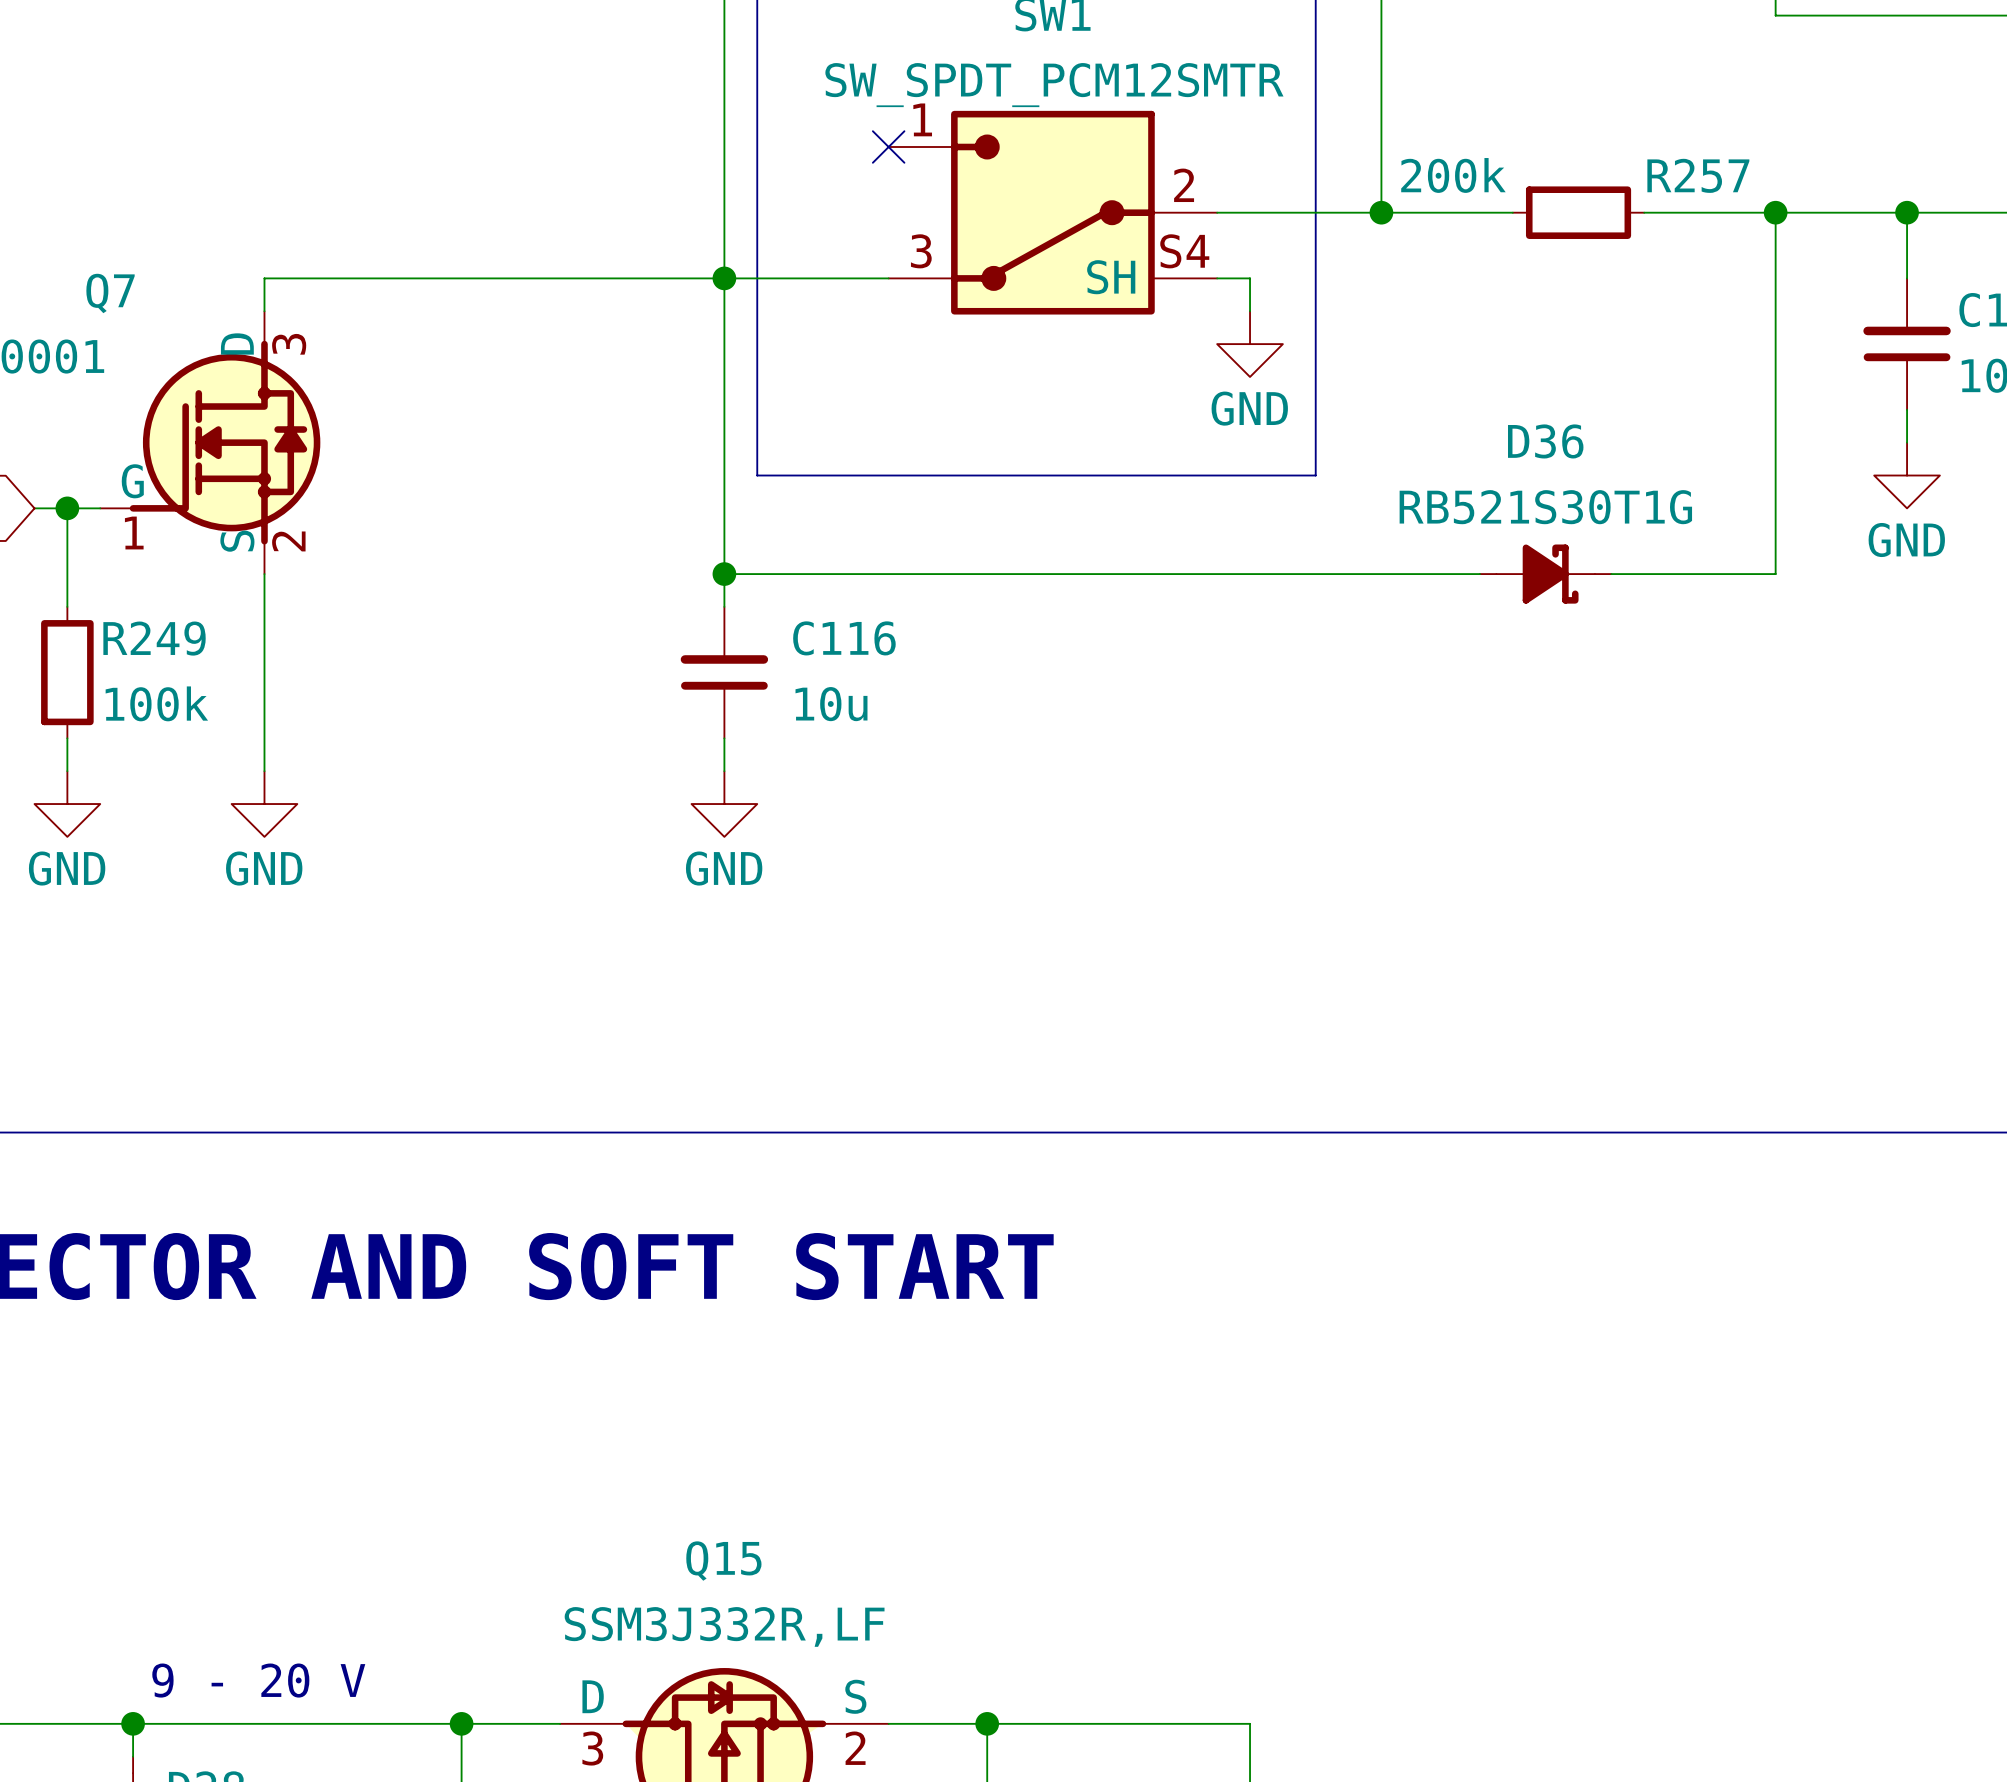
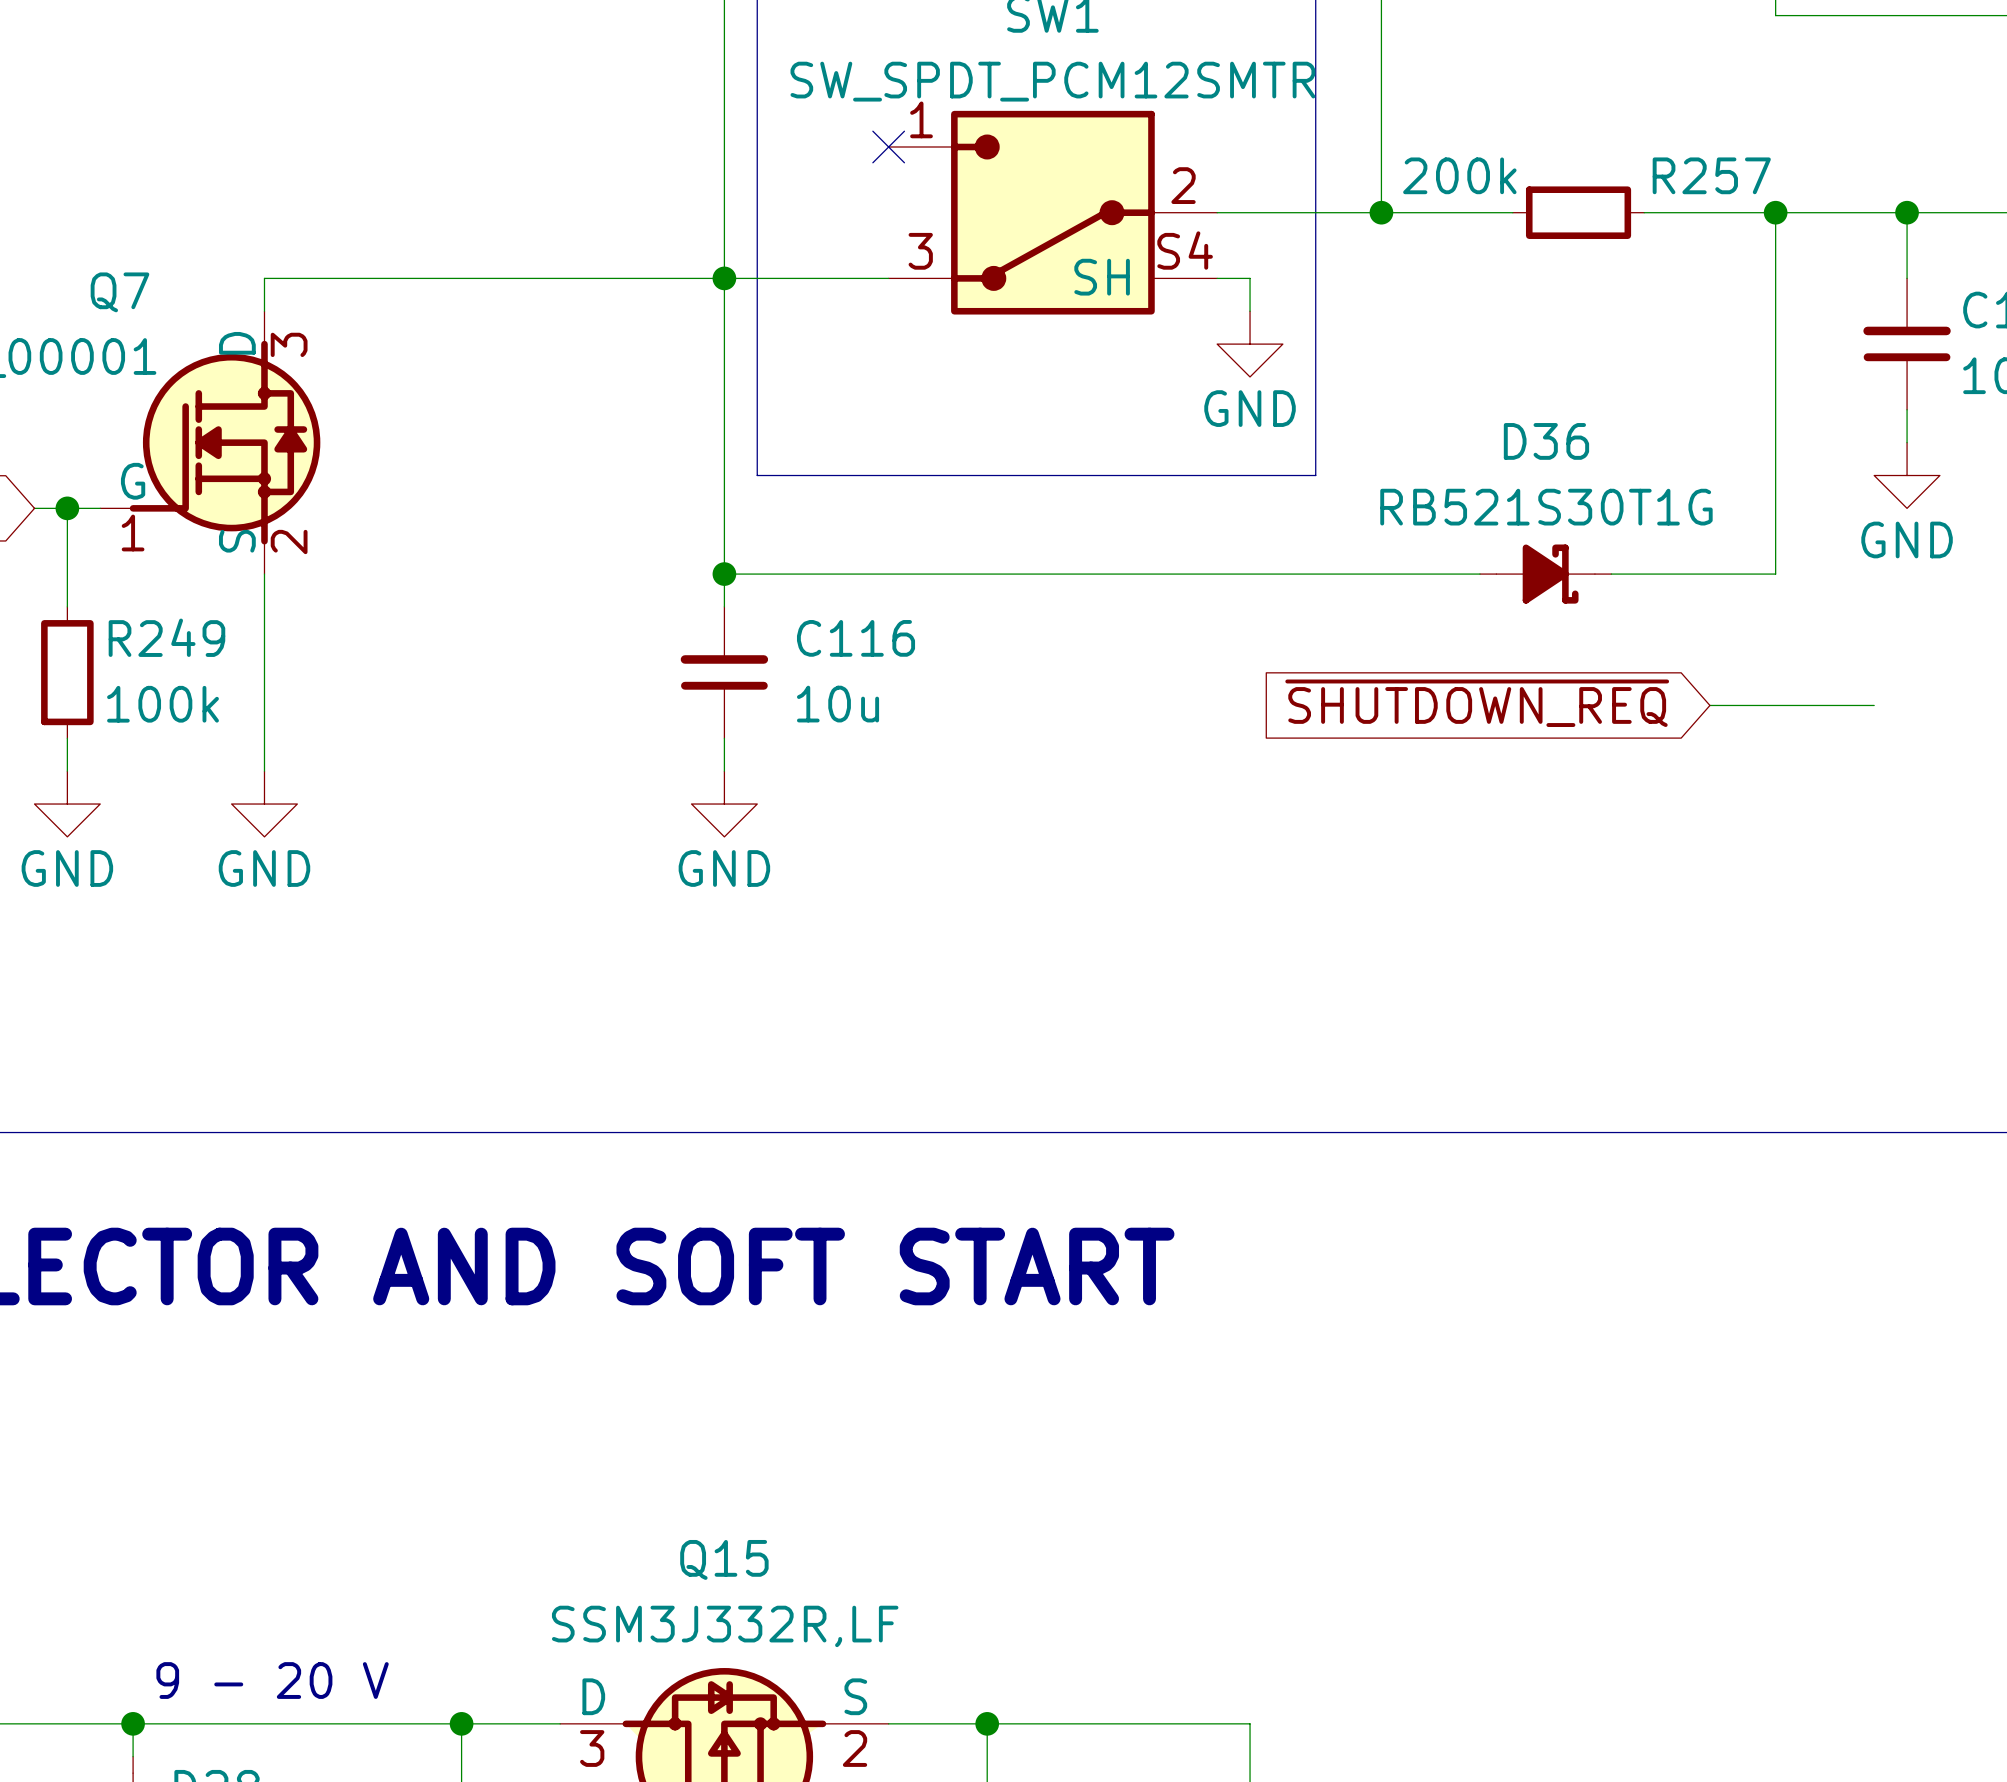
wire: none -> (1709, 705) (1874, 705)
global label: none -> ~{SHUTDOWN_REQ} (1477, 703)

